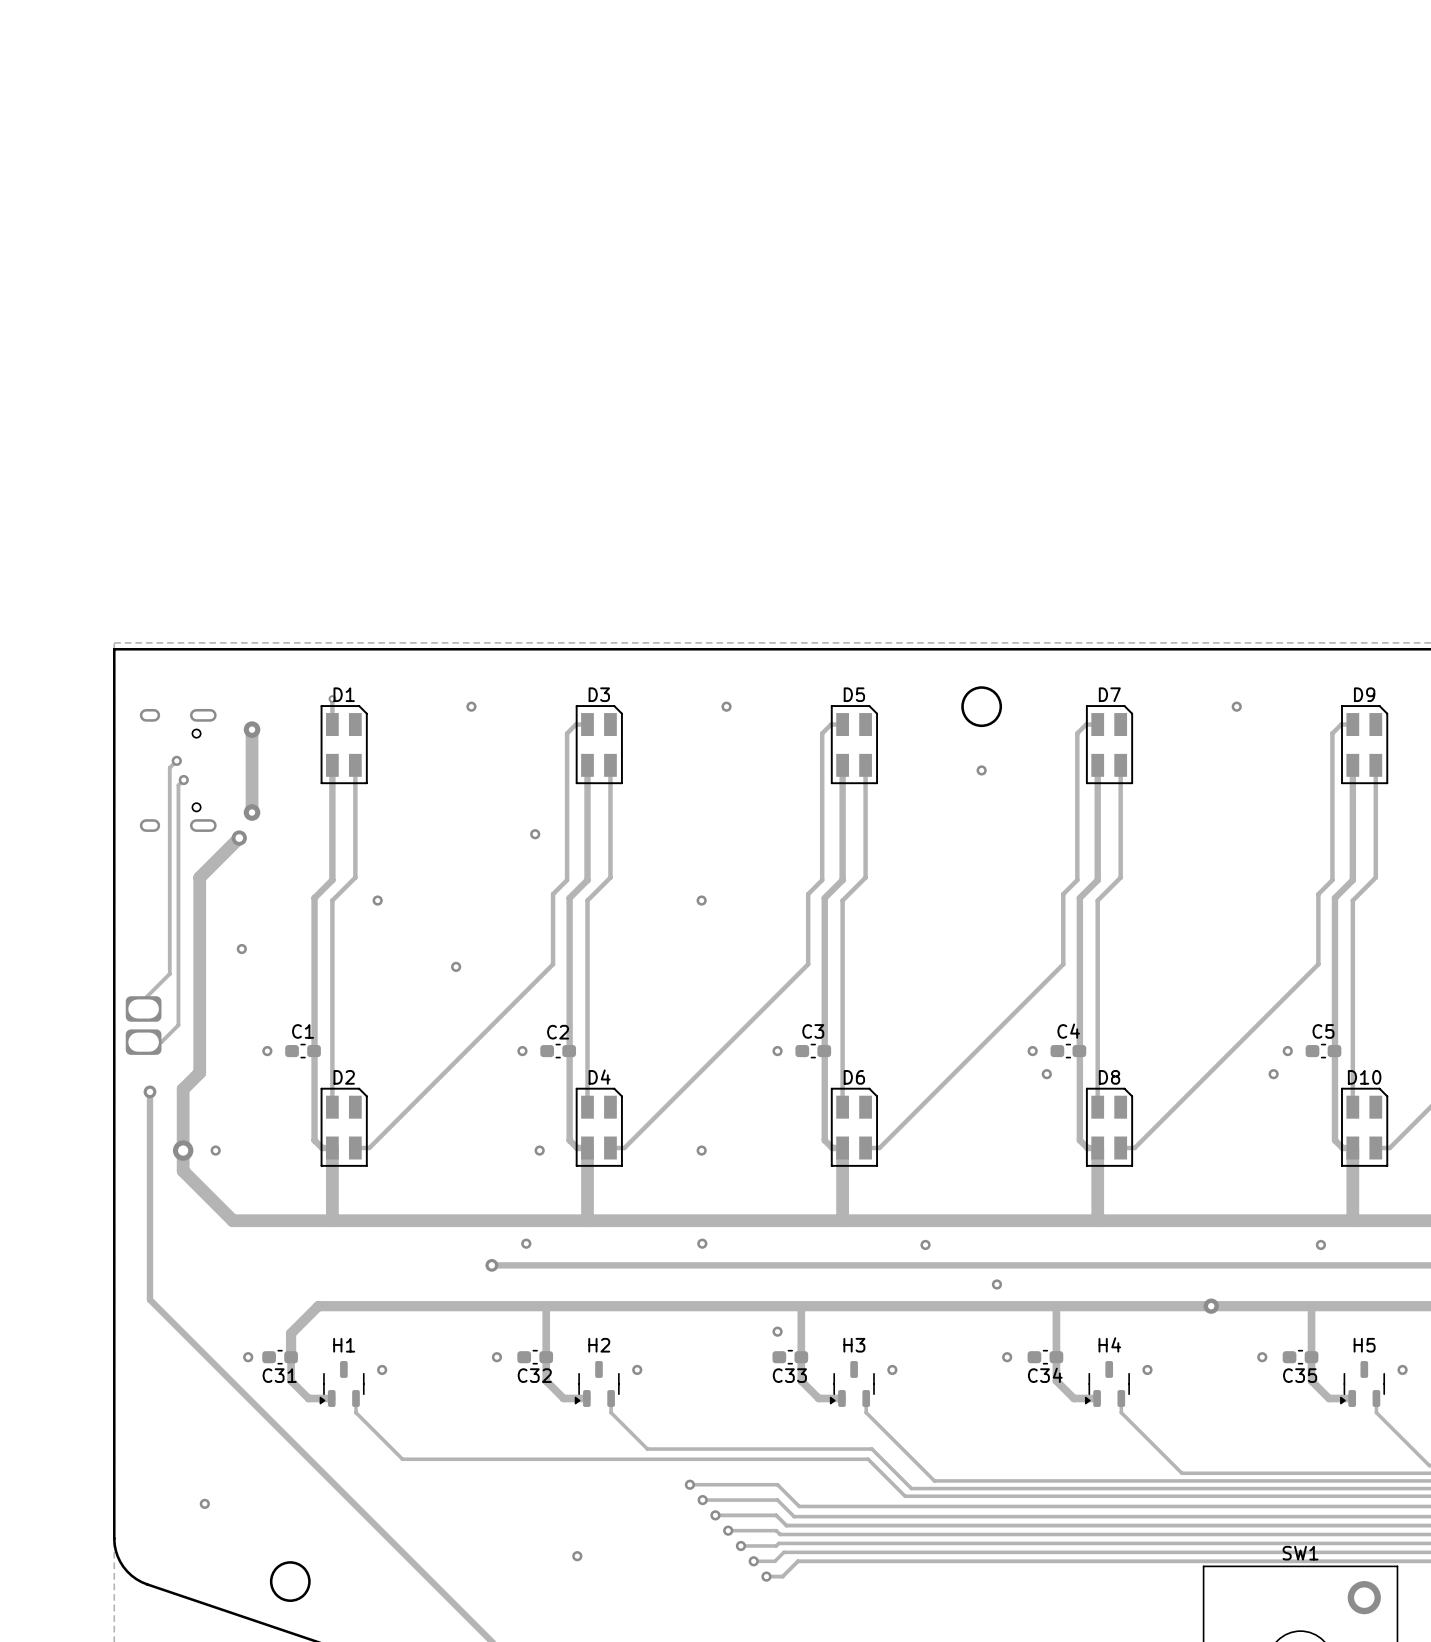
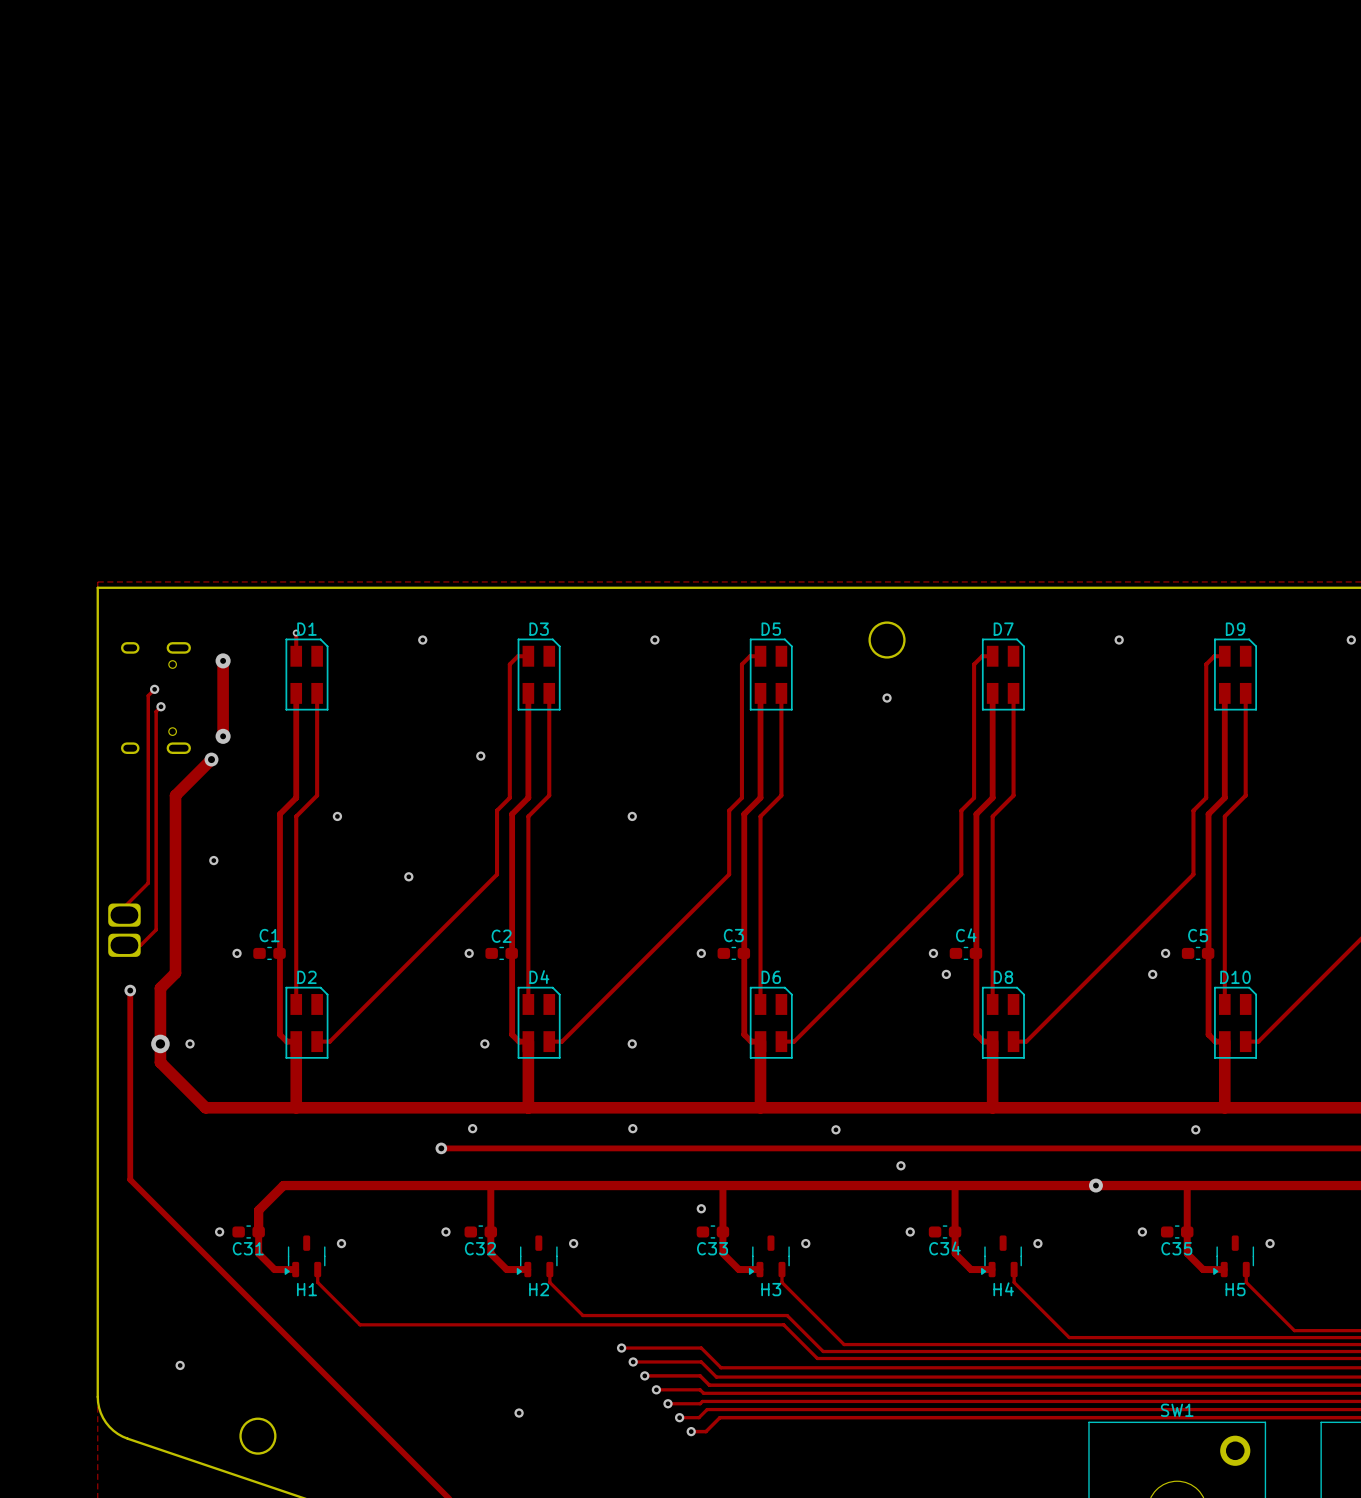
H4 name position: H4 (1109, 1344) -> H4 (1003, 1289)
H1 name position: H1 (344, 1345) -> H1 (306, 1289)
H2 name position: H2 (599, 1345) -> H2 (539, 1289)
H3 name position: H3 (854, 1345) -> H3 (771, 1289)
H5 name position: H5 (1364, 1345) -> H5 (1235, 1289)

